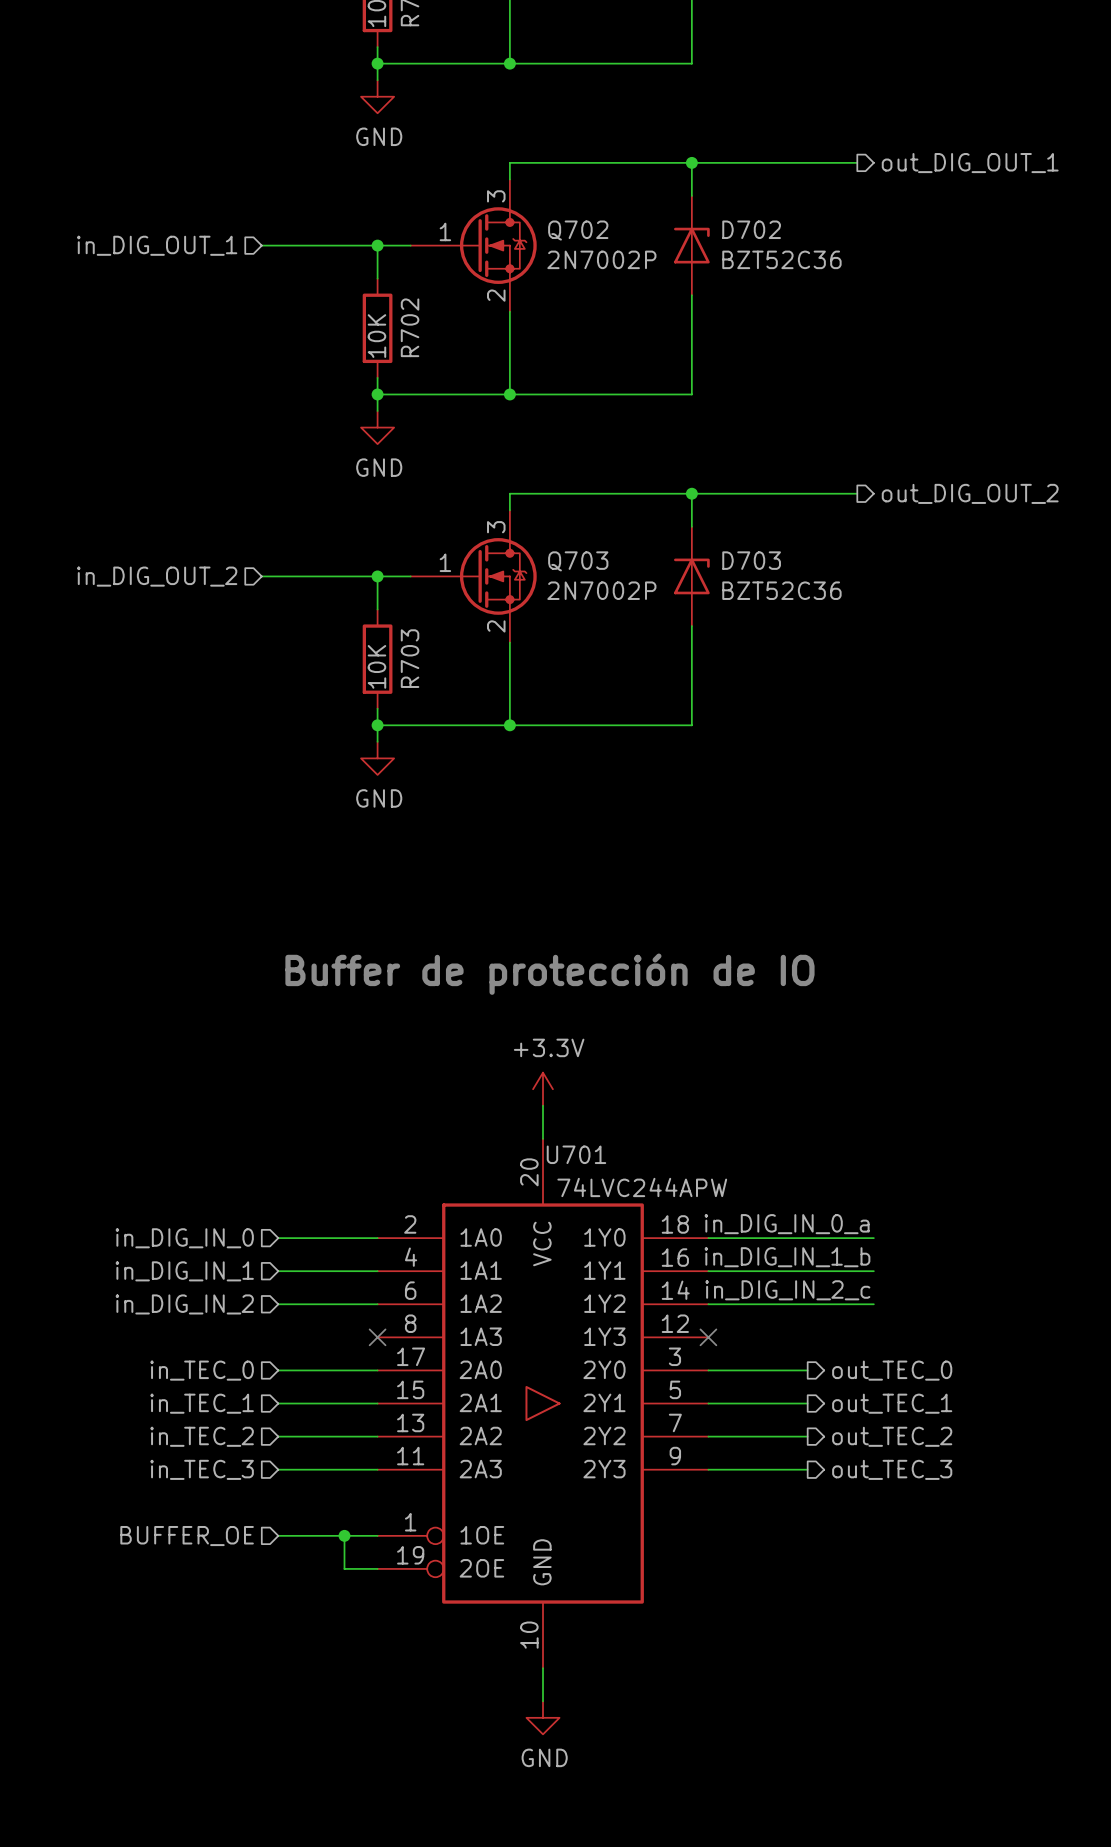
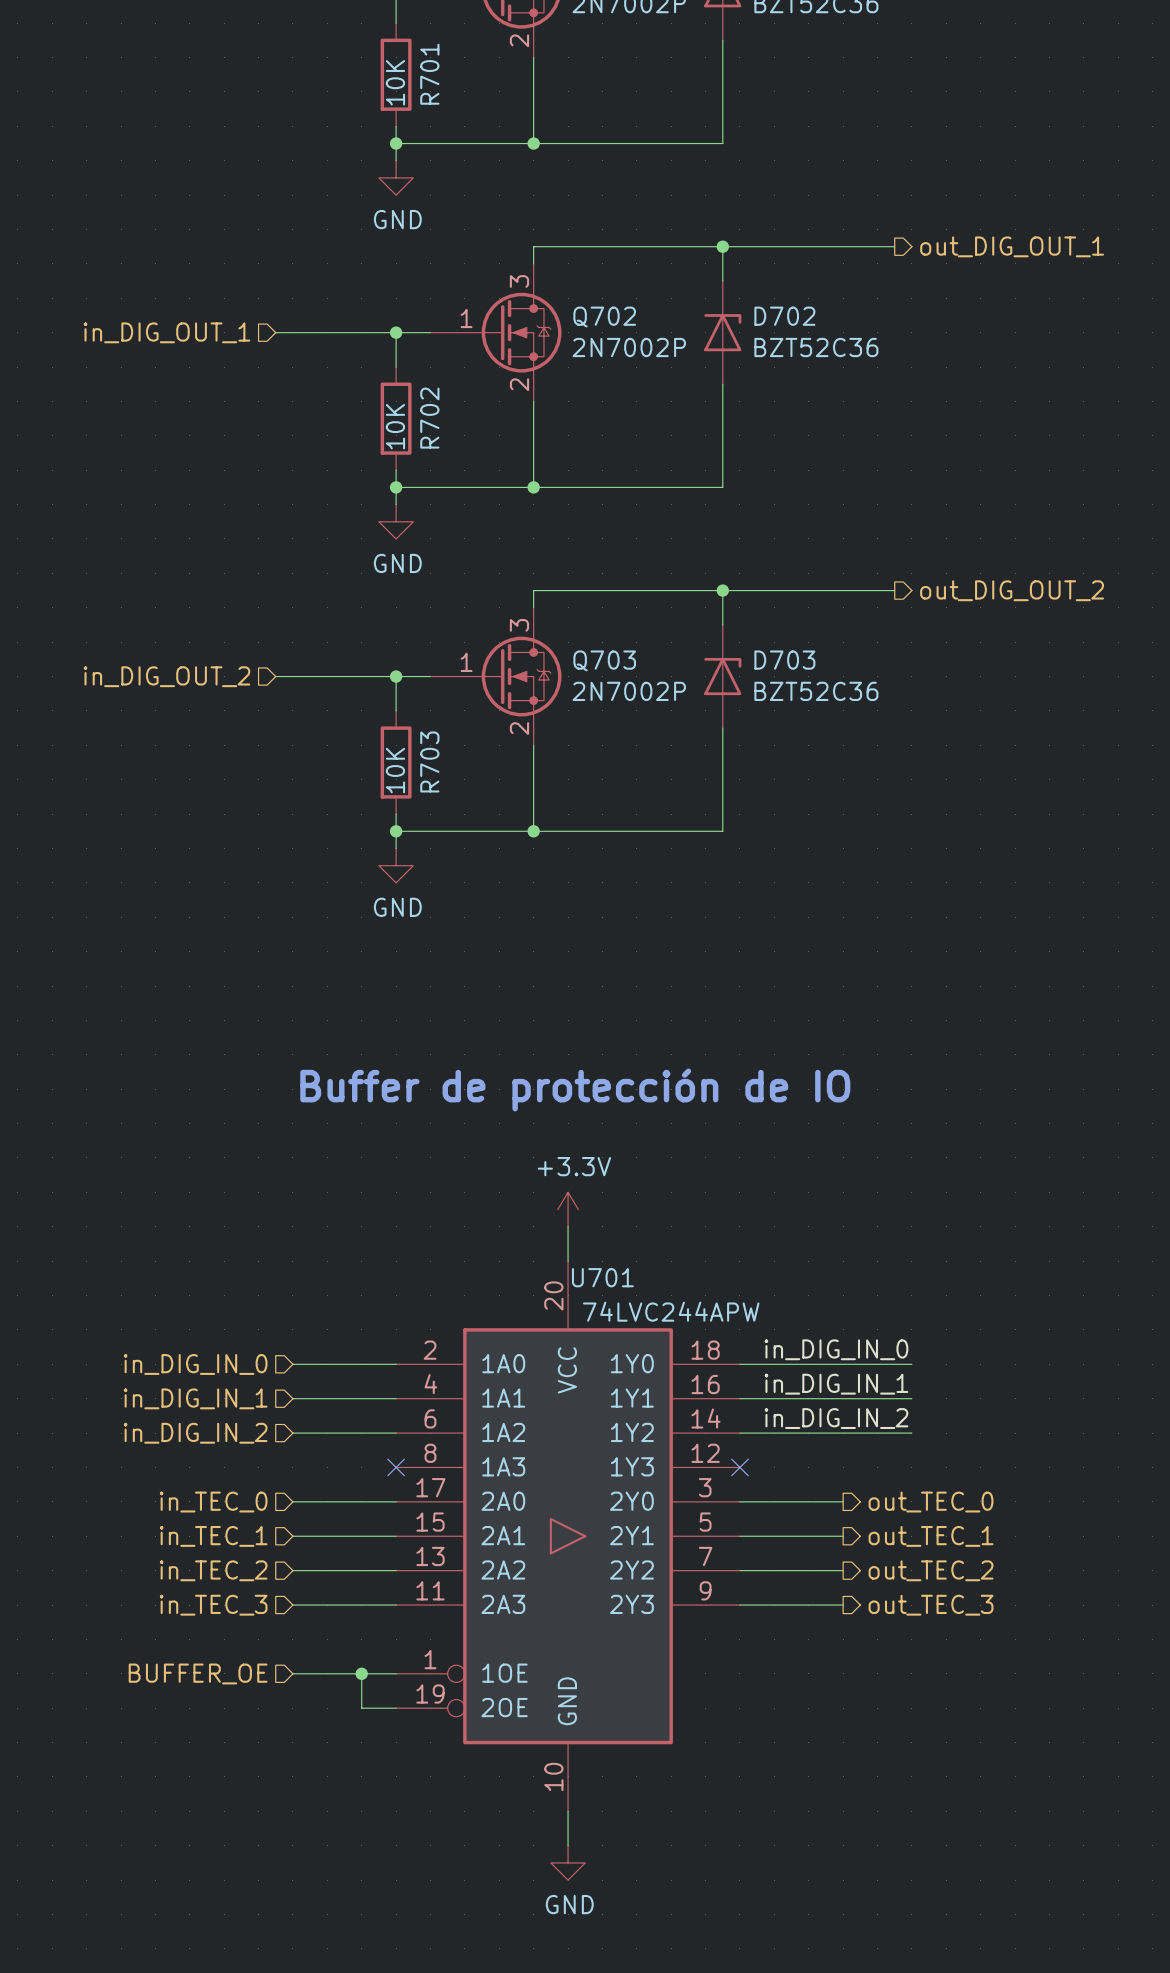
label: in_DIG_IN_0_a (787, 1224) -> in_DIG_IN_0 (836, 1349)
label: in_DIG_IN_1_b (787, 1257) -> in_DIG_IN_1 (836, 1384)
label: in_DIG_IN_2_c (787, 1290) -> in_DIG_IN_2 (836, 1418)

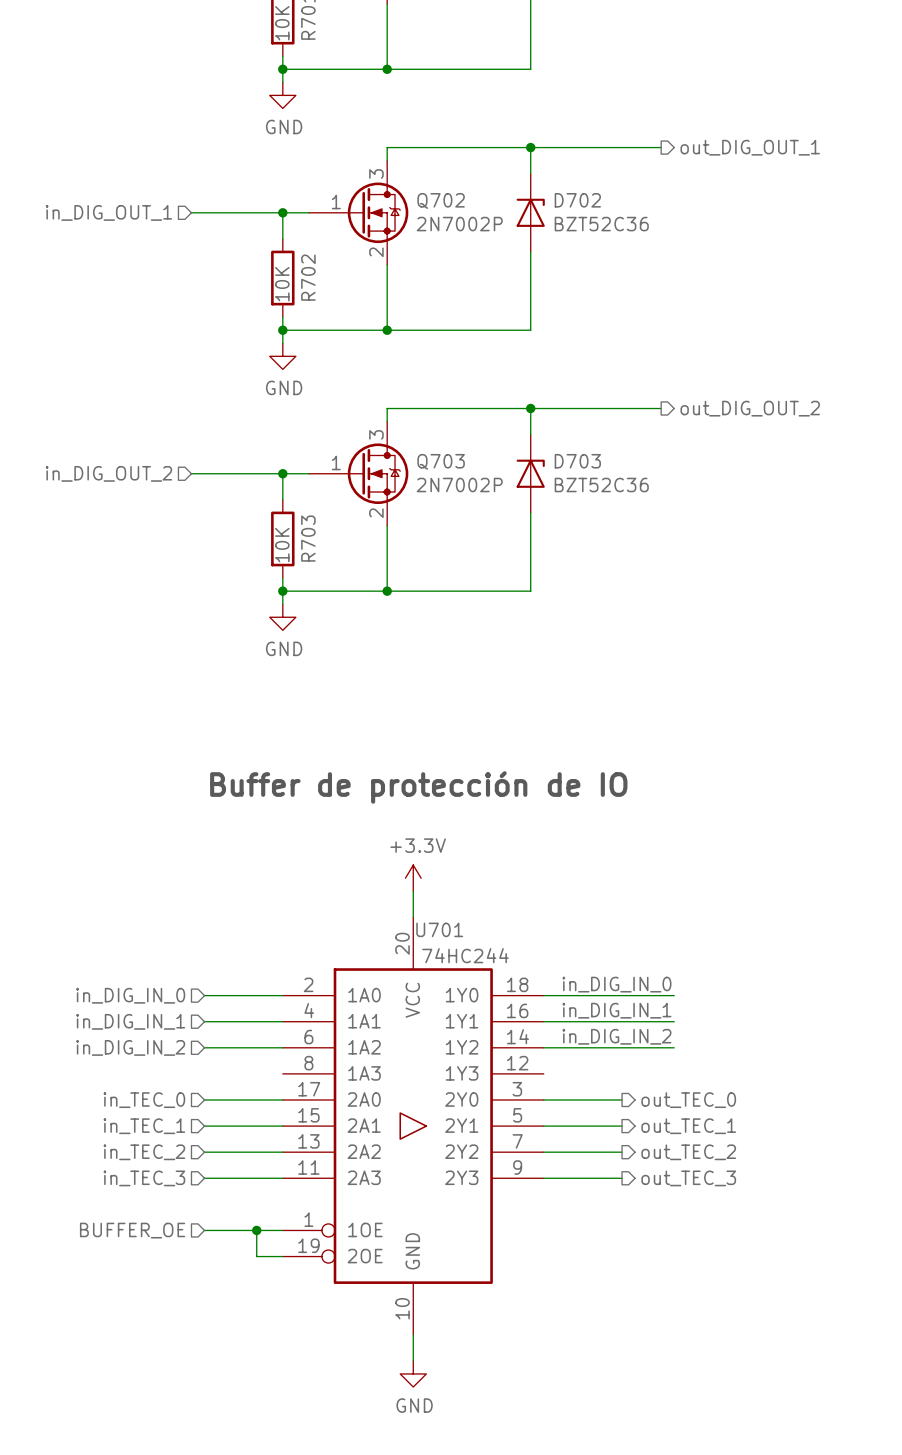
U701 value: 74LVC244APW (671, 1311) -> 74HC244 (465, 955)
no-connect mark: (396, 1467) -> none
no-connect mark: (739, 1467) -> none

